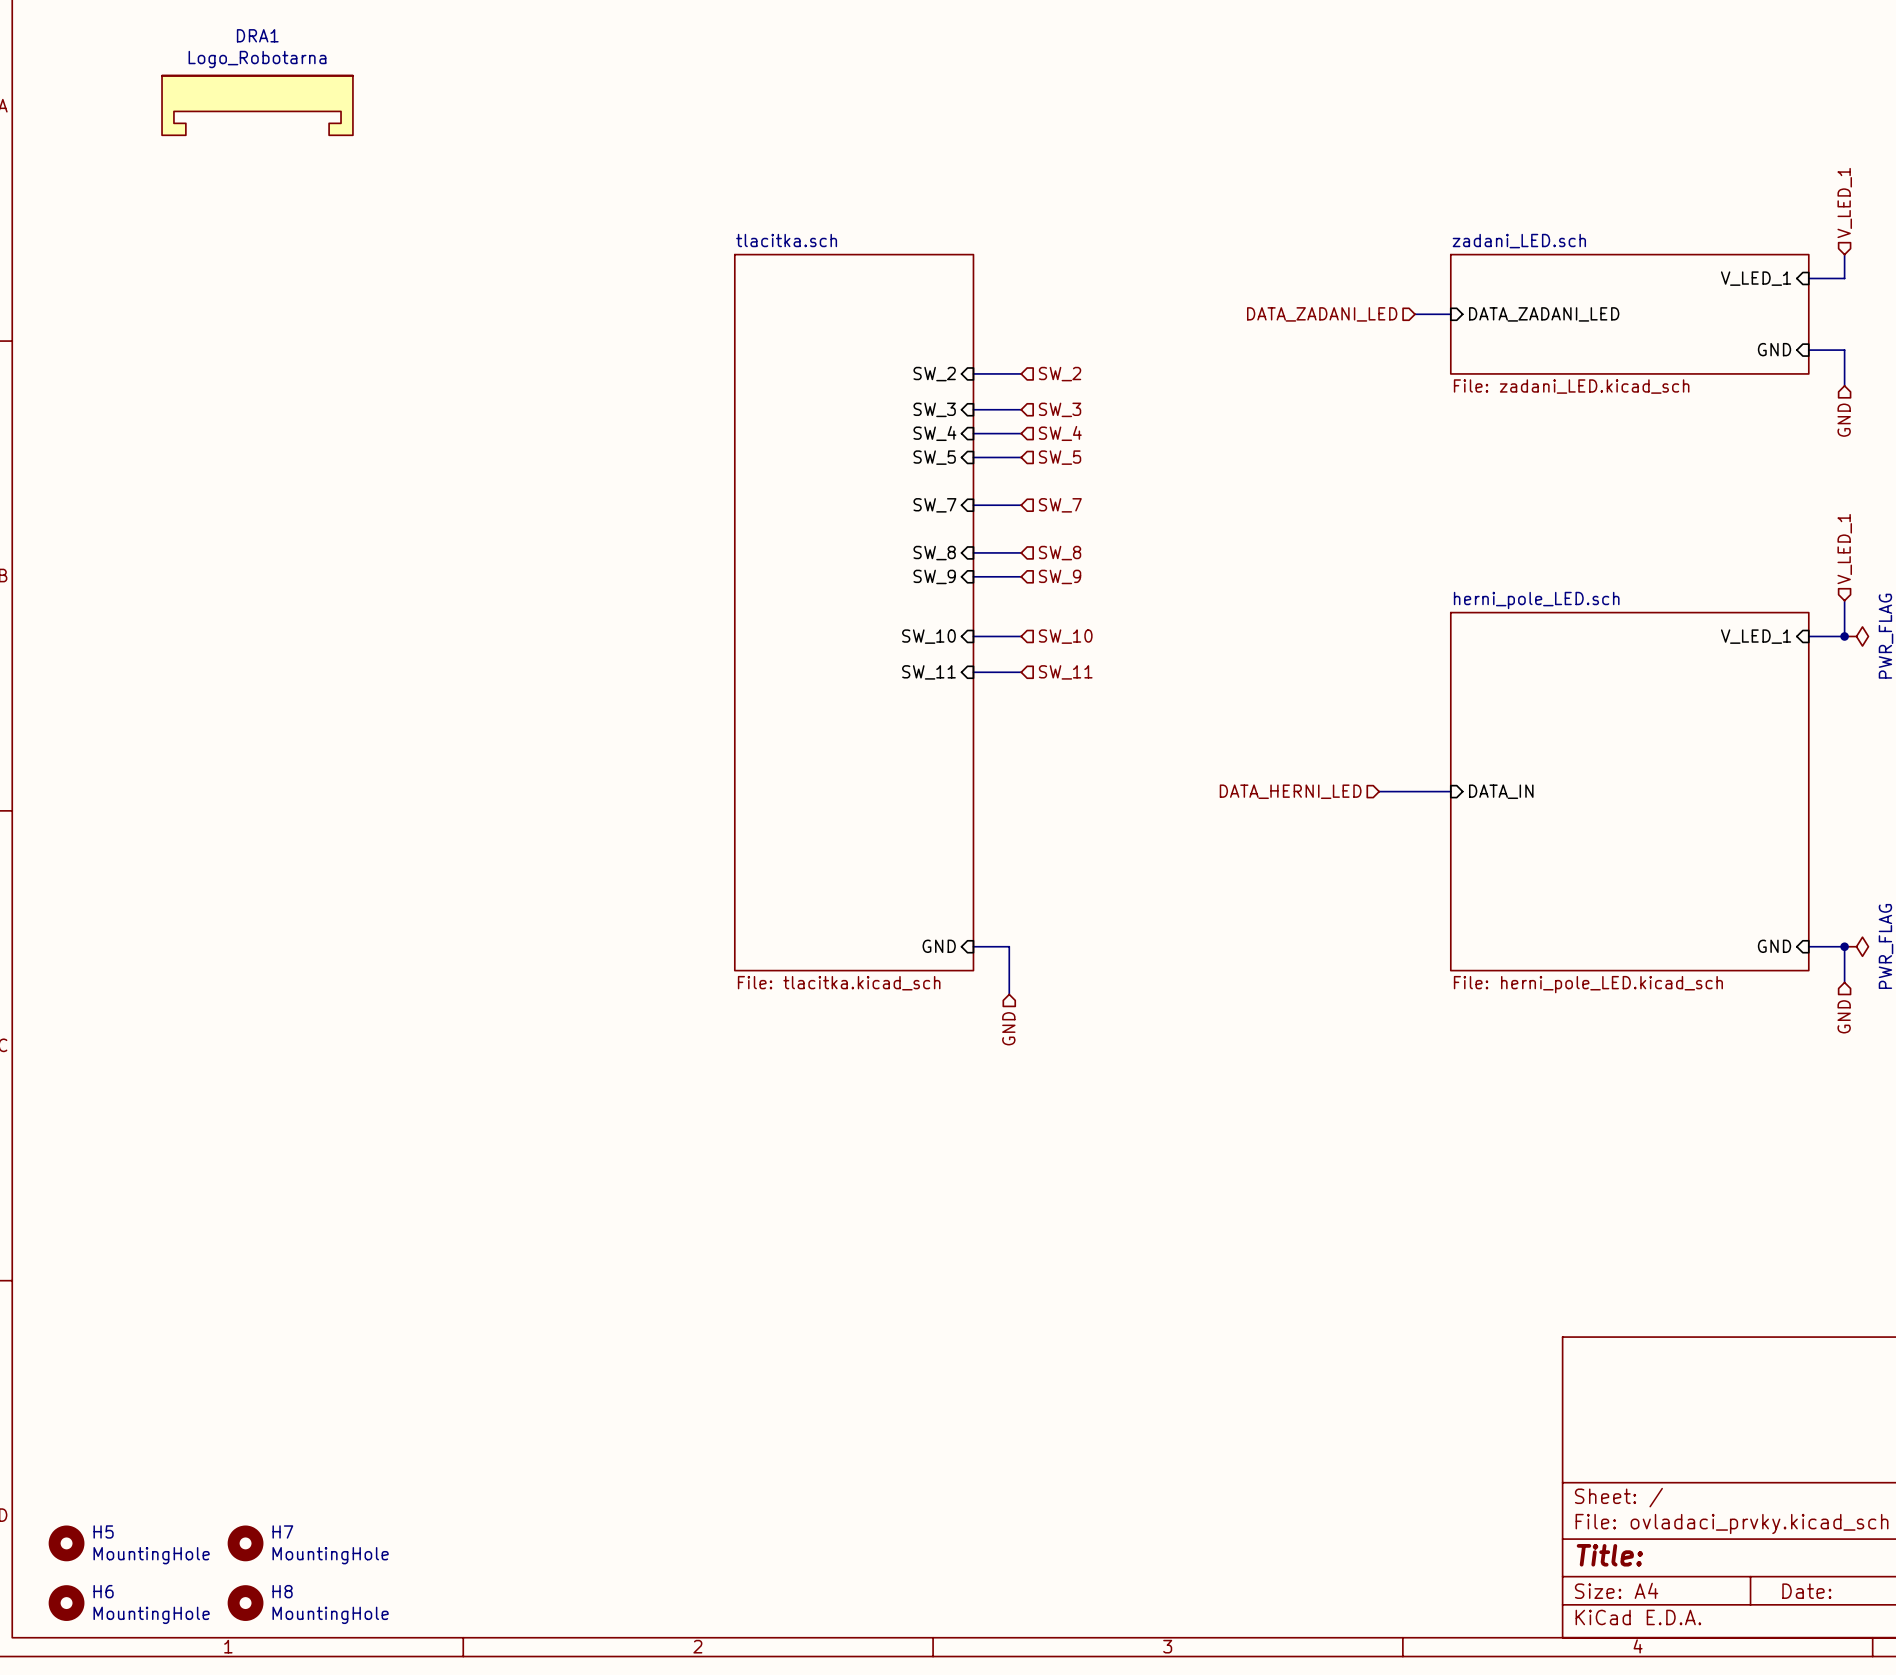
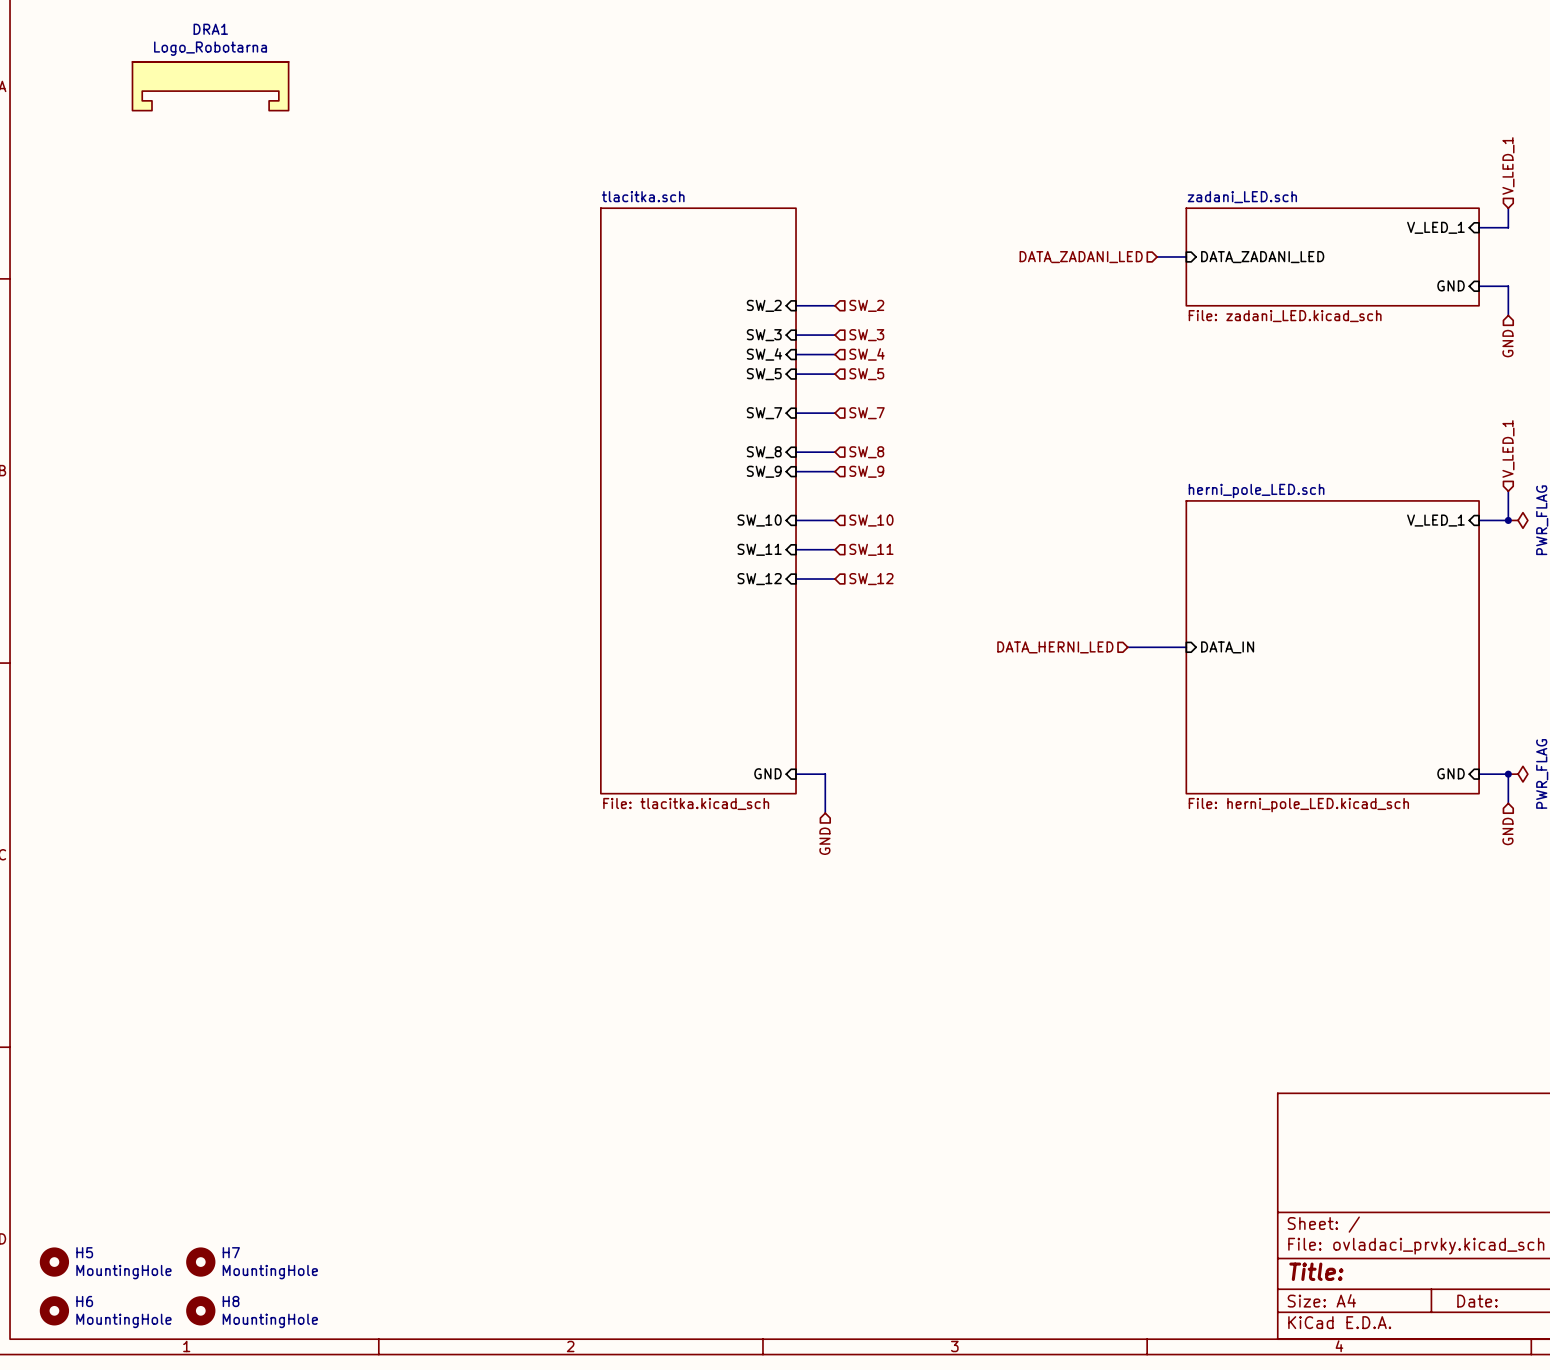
sheet pin: none -> SW_12 (759, 579)
wire: none -> (796, 579) (835, 579)
hierarchical label: none -> SW_12 (871, 579)

